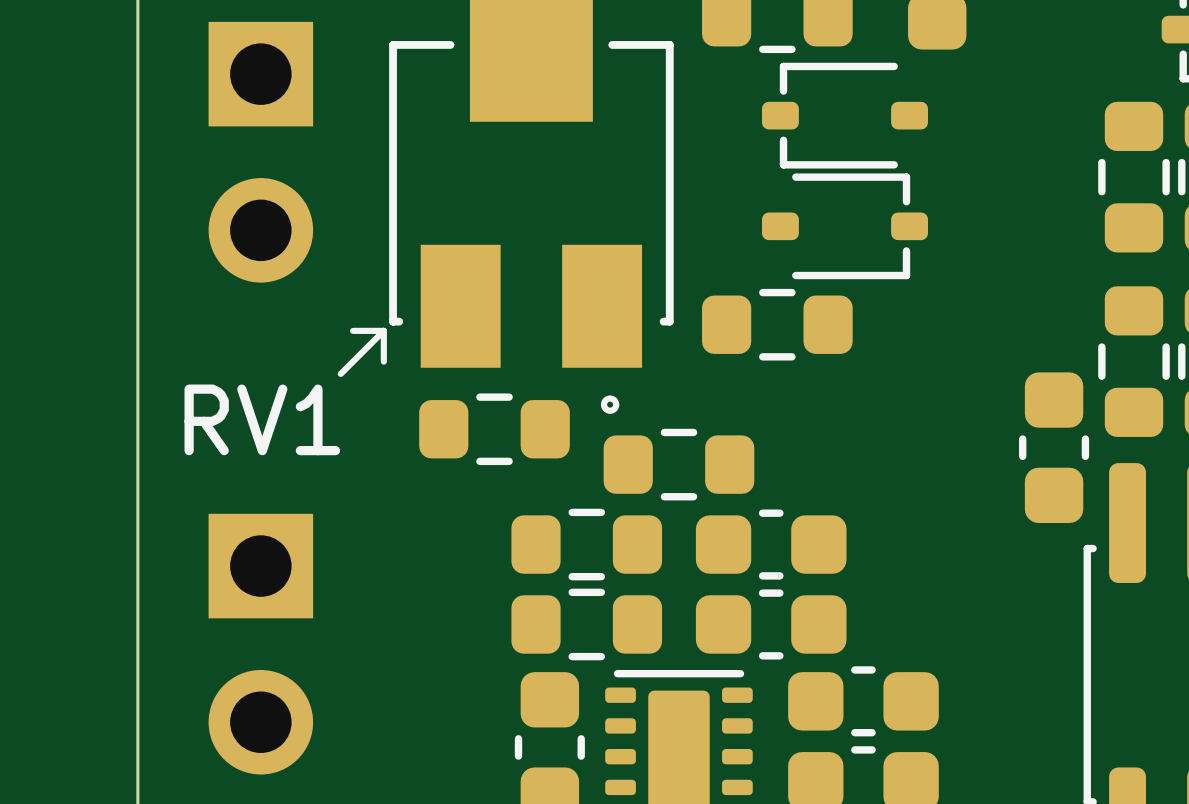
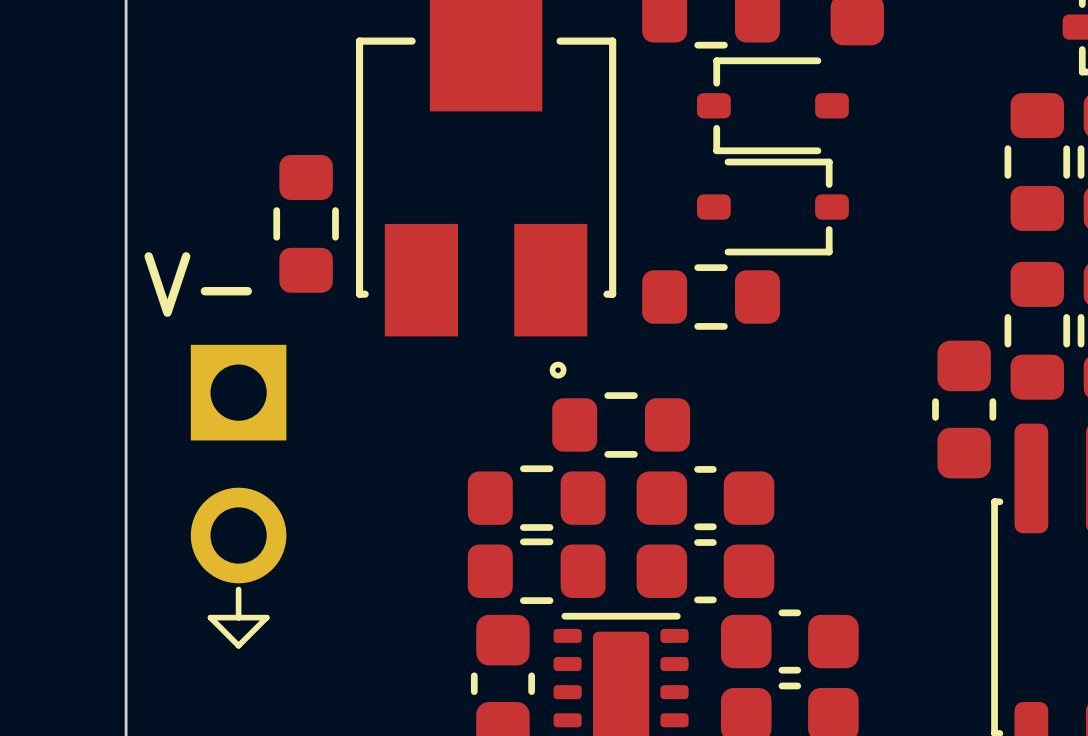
part: (260, 152) -> none
line: (353, 330) (383, 330) -> none
line: (383, 330) (383, 361) -> (238, 589) (238, 617)
line: (383, 330) (340, 373) -> none
text: RV1 (262, 419) -> V- (198, 284)
part rotation: 0° (494, 429) -> 90° clockwise (306, 223)
part position: (494, 429) -> (306, 223)
part position: (260, 644) -> (238, 464)
line: none -> (210, 617) (266, 617) (238, 645) (210, 617)

